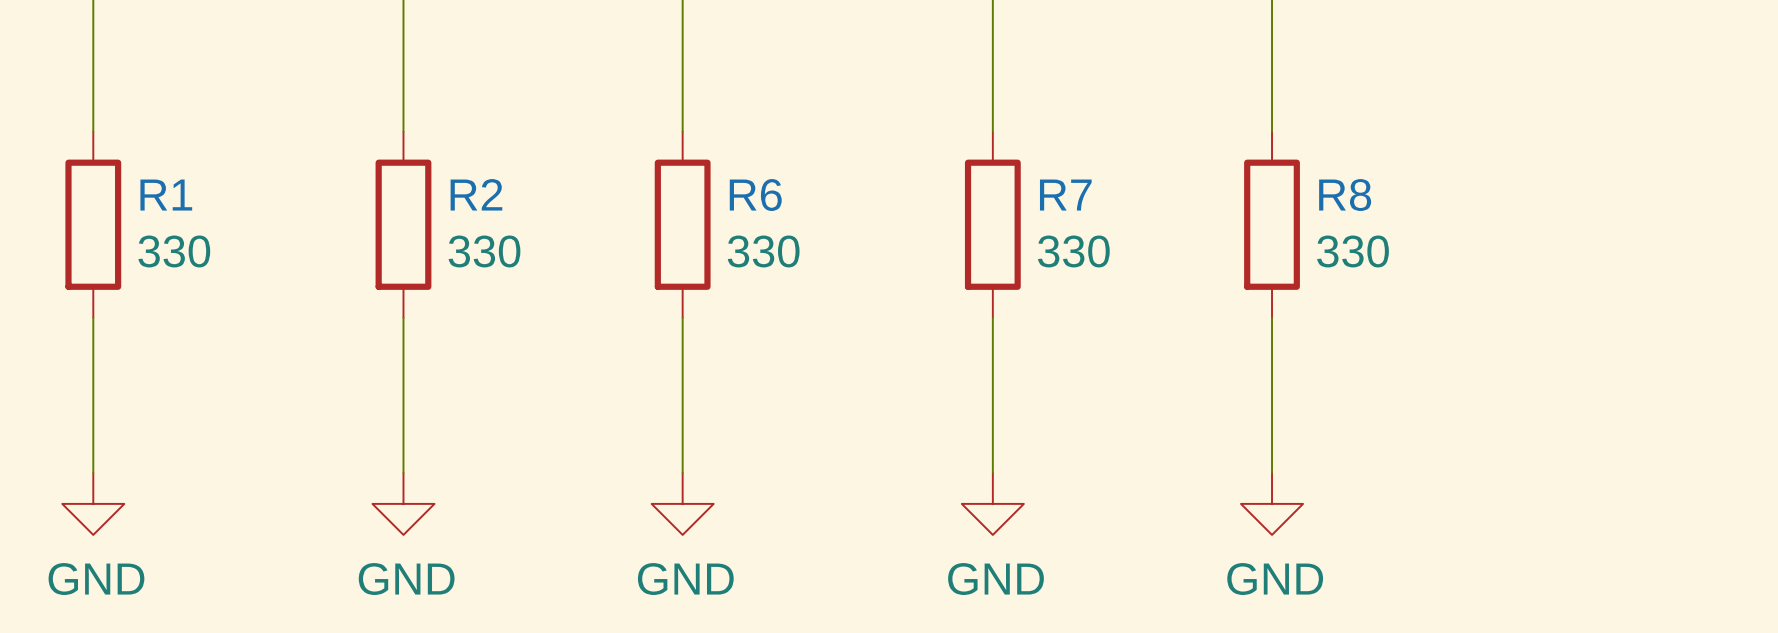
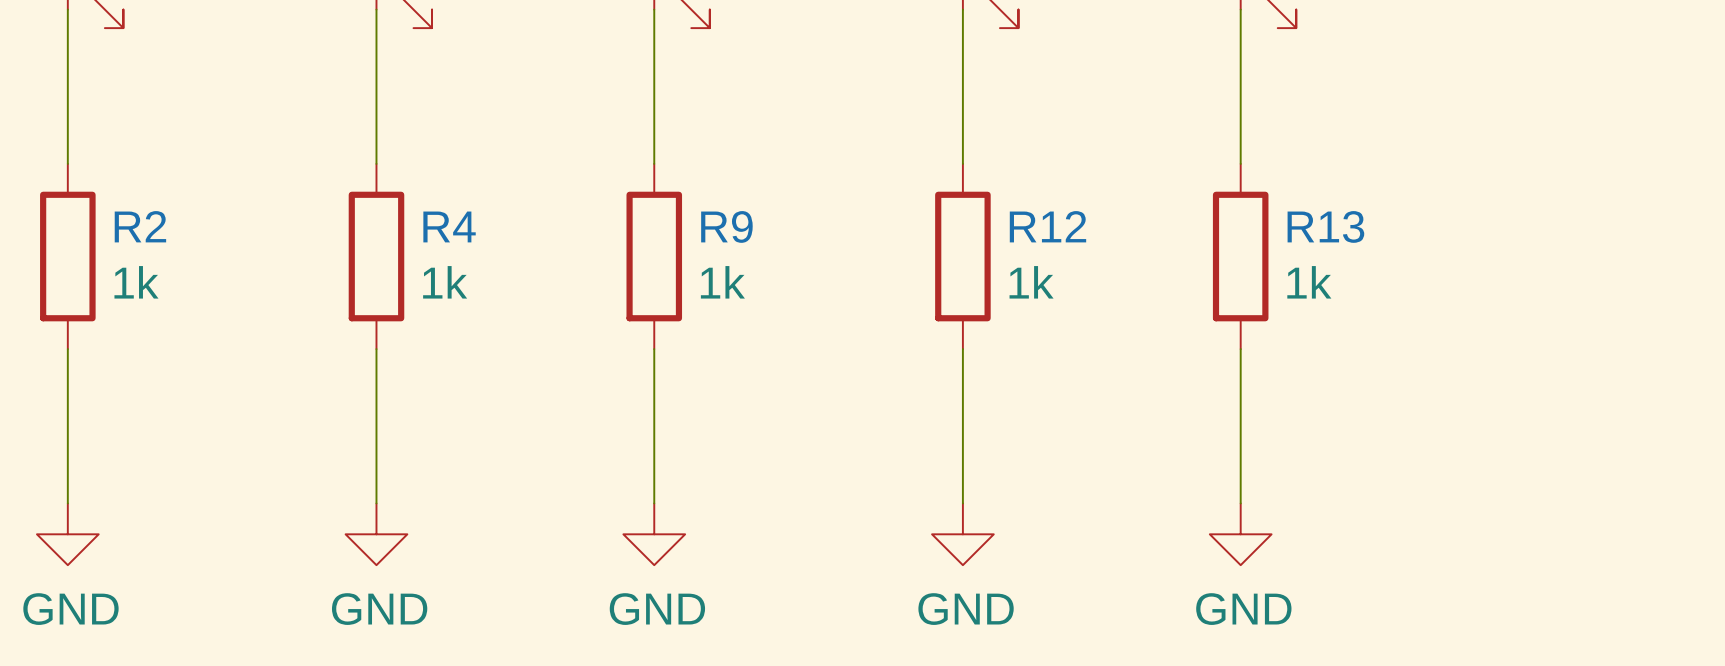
R2 name: R2 (476, 194) -> R4 (449, 226)
R1 name: R1 (166, 195) -> R2 (140, 226)
R6 name: R6 (755, 195) -> R9 (726, 226)
R7 name: R7 (1065, 195) -> R12 (1047, 226)
R8 name: R8 (1345, 195) -> R13 (1325, 226)
R1 value: 330 (174, 251) -> 1k (136, 282)
R2 value: 330 (484, 251) -> 1k (445, 282)
R6 value: 330 (763, 251) -> 1k (722, 282)
R7 value: 330 (1073, 251) -> 1k (1031, 282)
R8 value: 330 (1353, 251) -> 1k (1309, 282)

